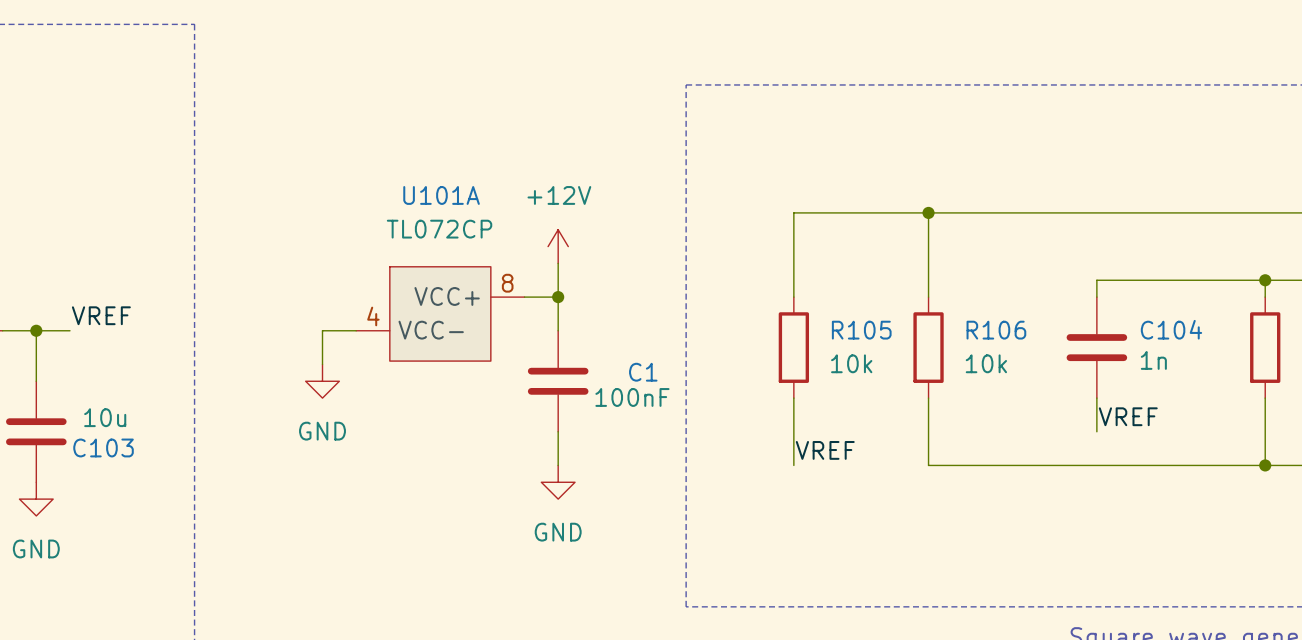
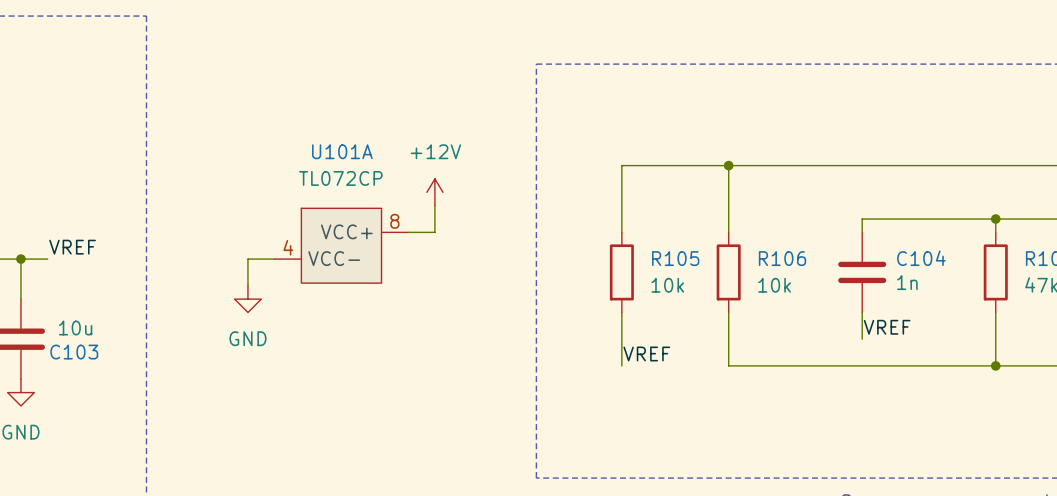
wire: (558, 297) (558, 330) -> none
junction: (558, 297) -> none
C1: 100nF (558, 381) -> none
wire: (558, 431) (558, 465) -> none
power symbol: GND (558, 482) -> none

